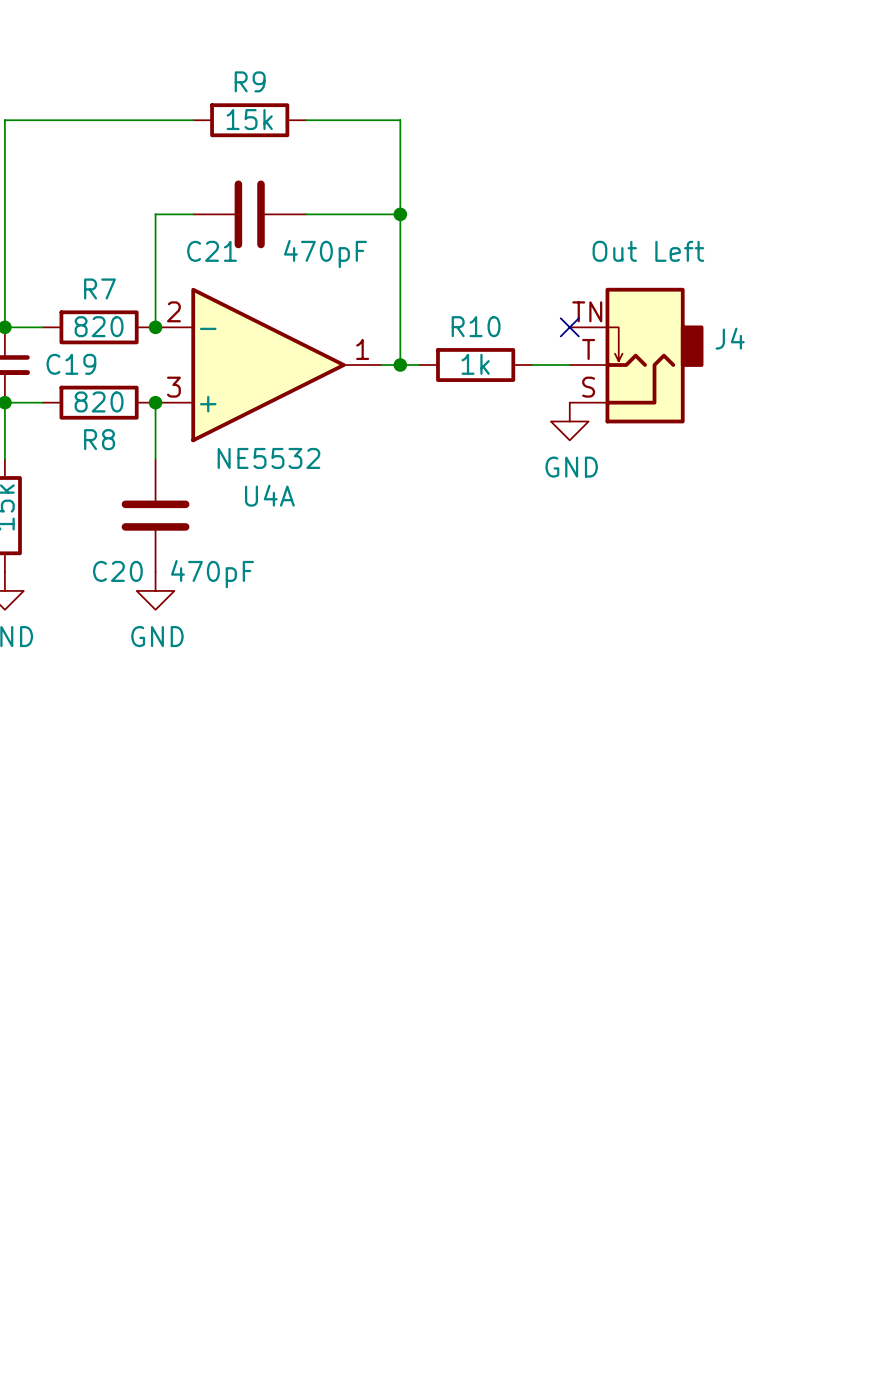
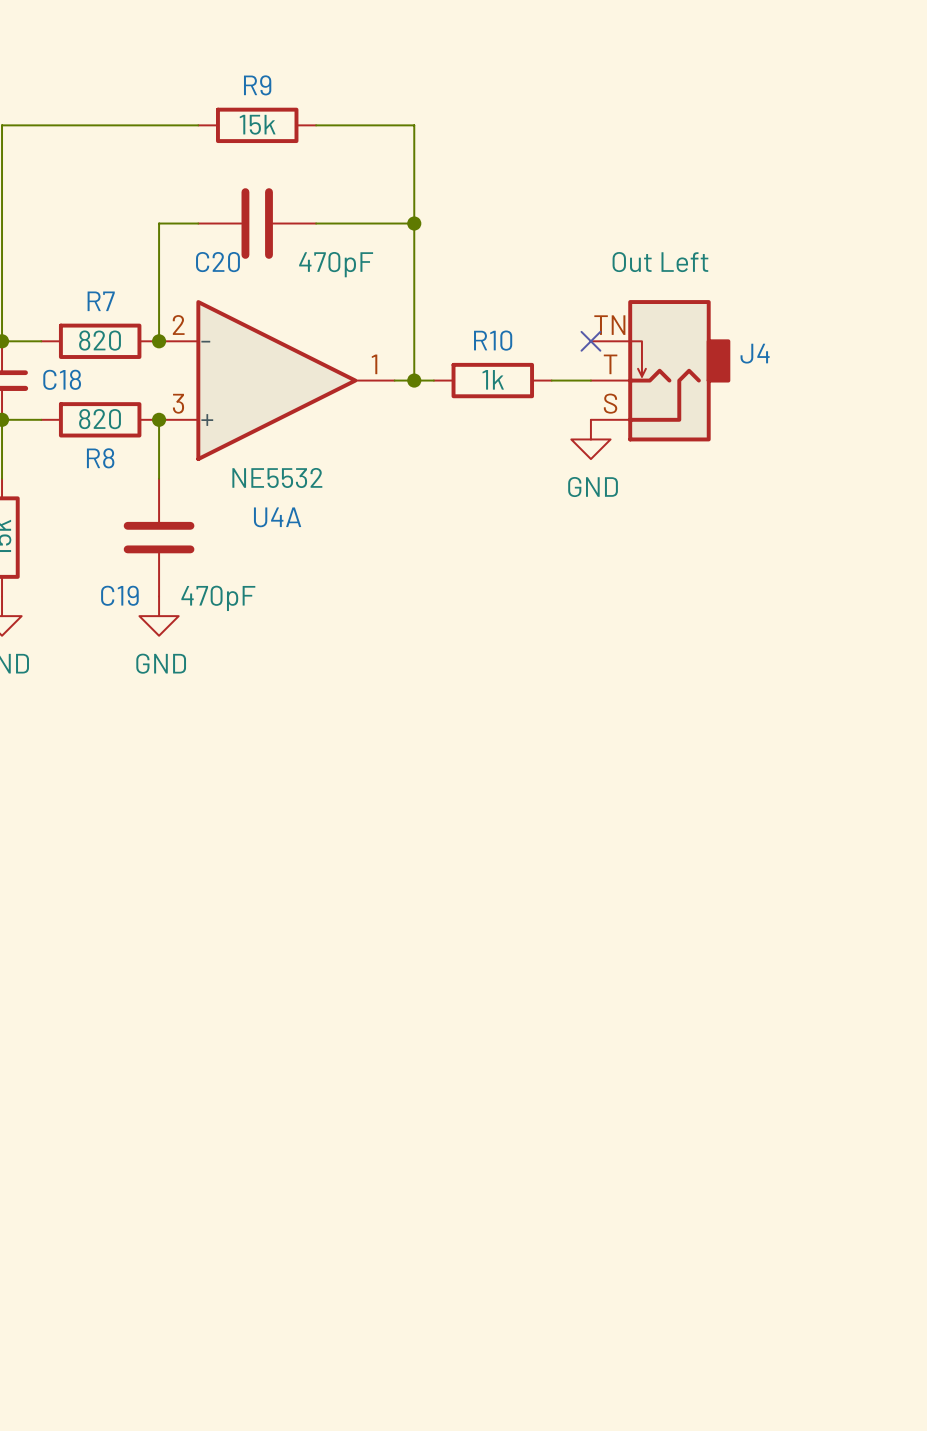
C21 name: C21 (212, 251) -> C20 (217, 262)
C19 name: C19 (71, 364) -> C18 (62, 379)
C20 name: C20 (117, 571) -> C19 (119, 595)

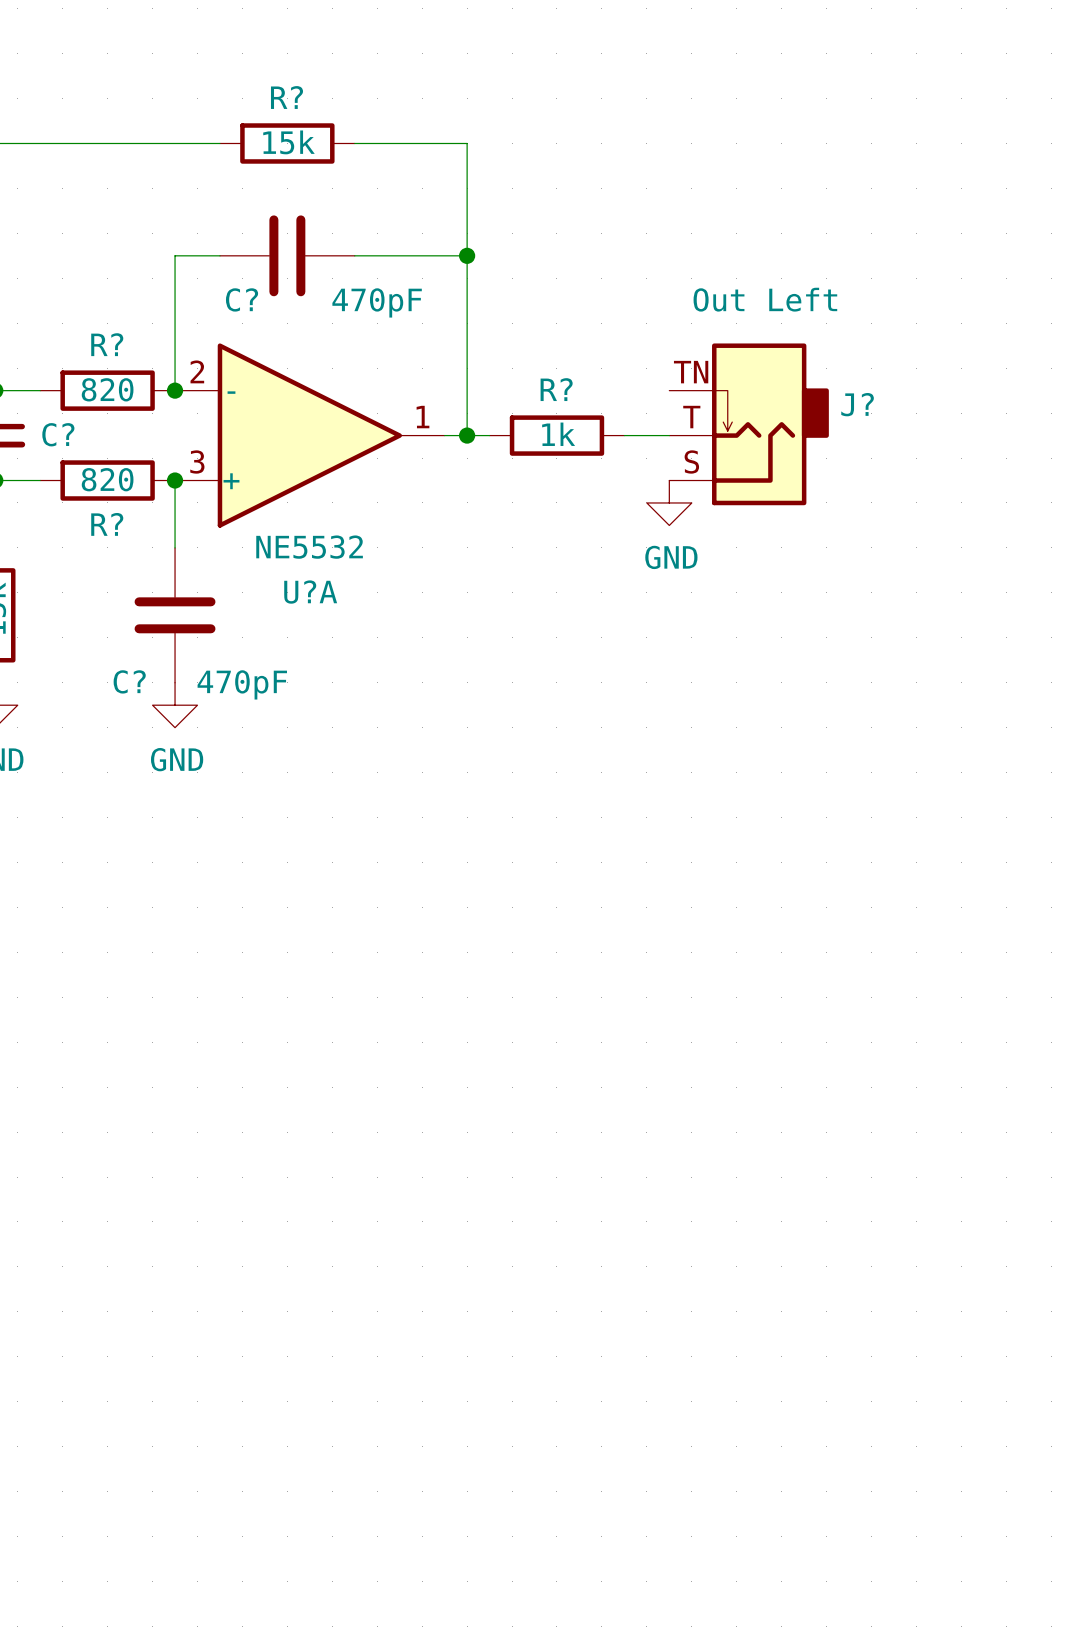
R9 name: R9 (257, 85) -> R? (286, 97)
C20 name: C20 (217, 262) -> C? (242, 299)
R7 name: R7 (101, 301) -> R? (107, 344)
R10 name: R10 (493, 340) -> R? (556, 389)
no-connect mark: (590, 341) -> none
J4 name: J4 (755, 353) -> J? (857, 404)
C18 name: C18 (62, 379) -> C? (58, 434)
R8 name: R8 (100, 458) -> R? (107, 524)
U4A name: U4A (277, 517) -> U?A (310, 592)
C19 name: C19 (119, 595) -> C? (129, 681)

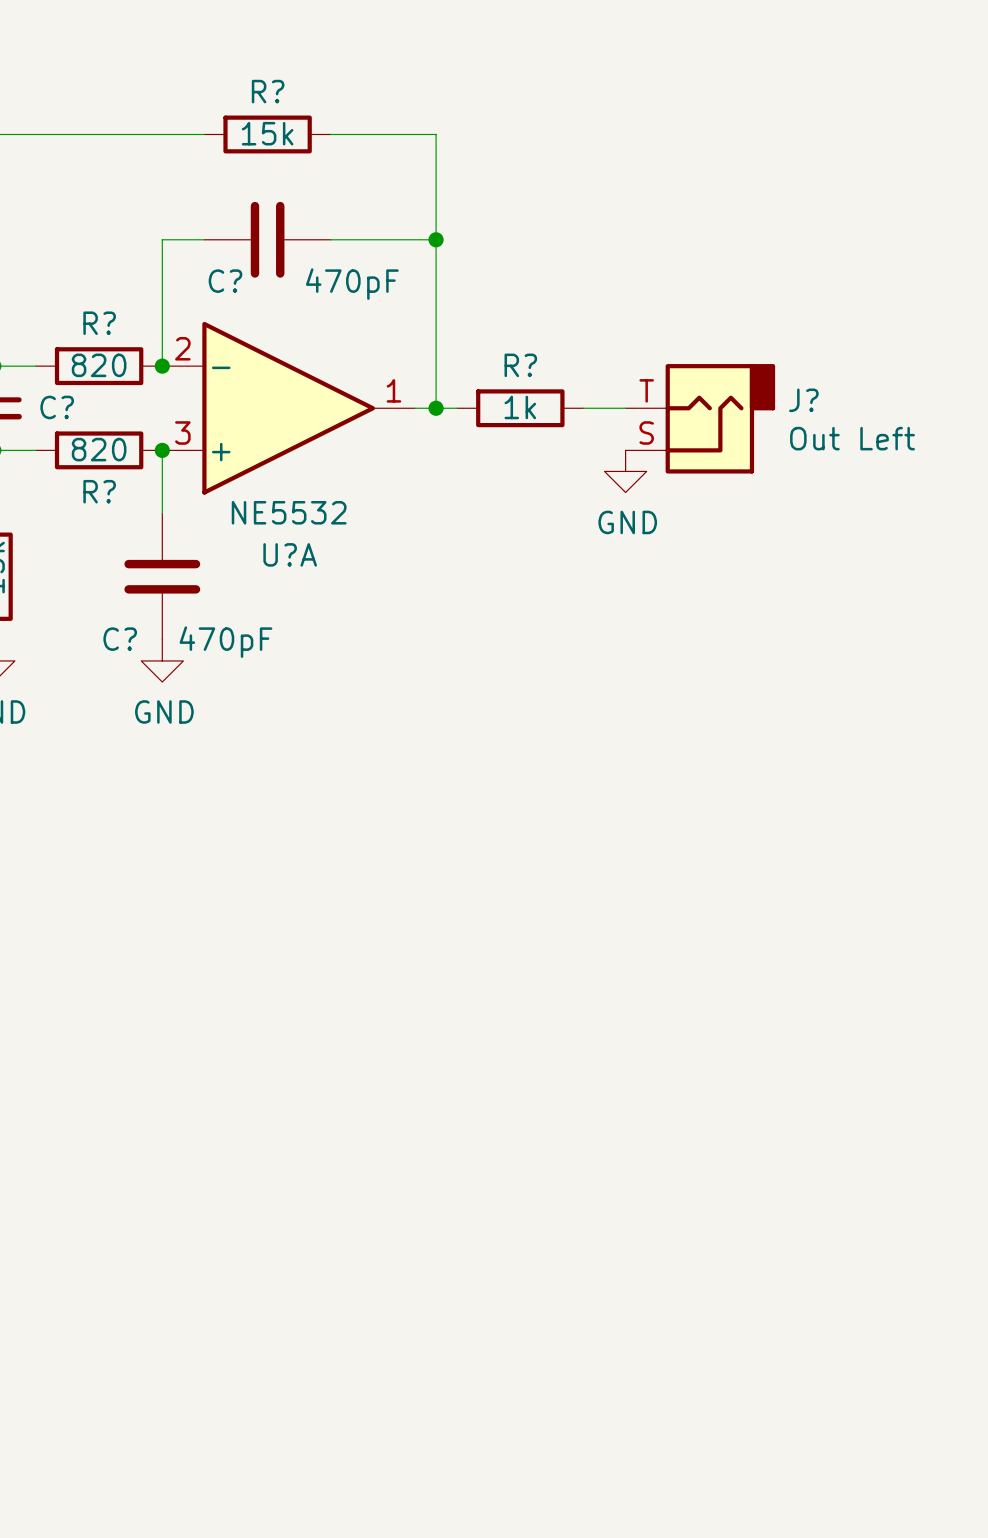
J?: Out Left (749, 424) -> none
J?: none -> Out Left (700, 418)

